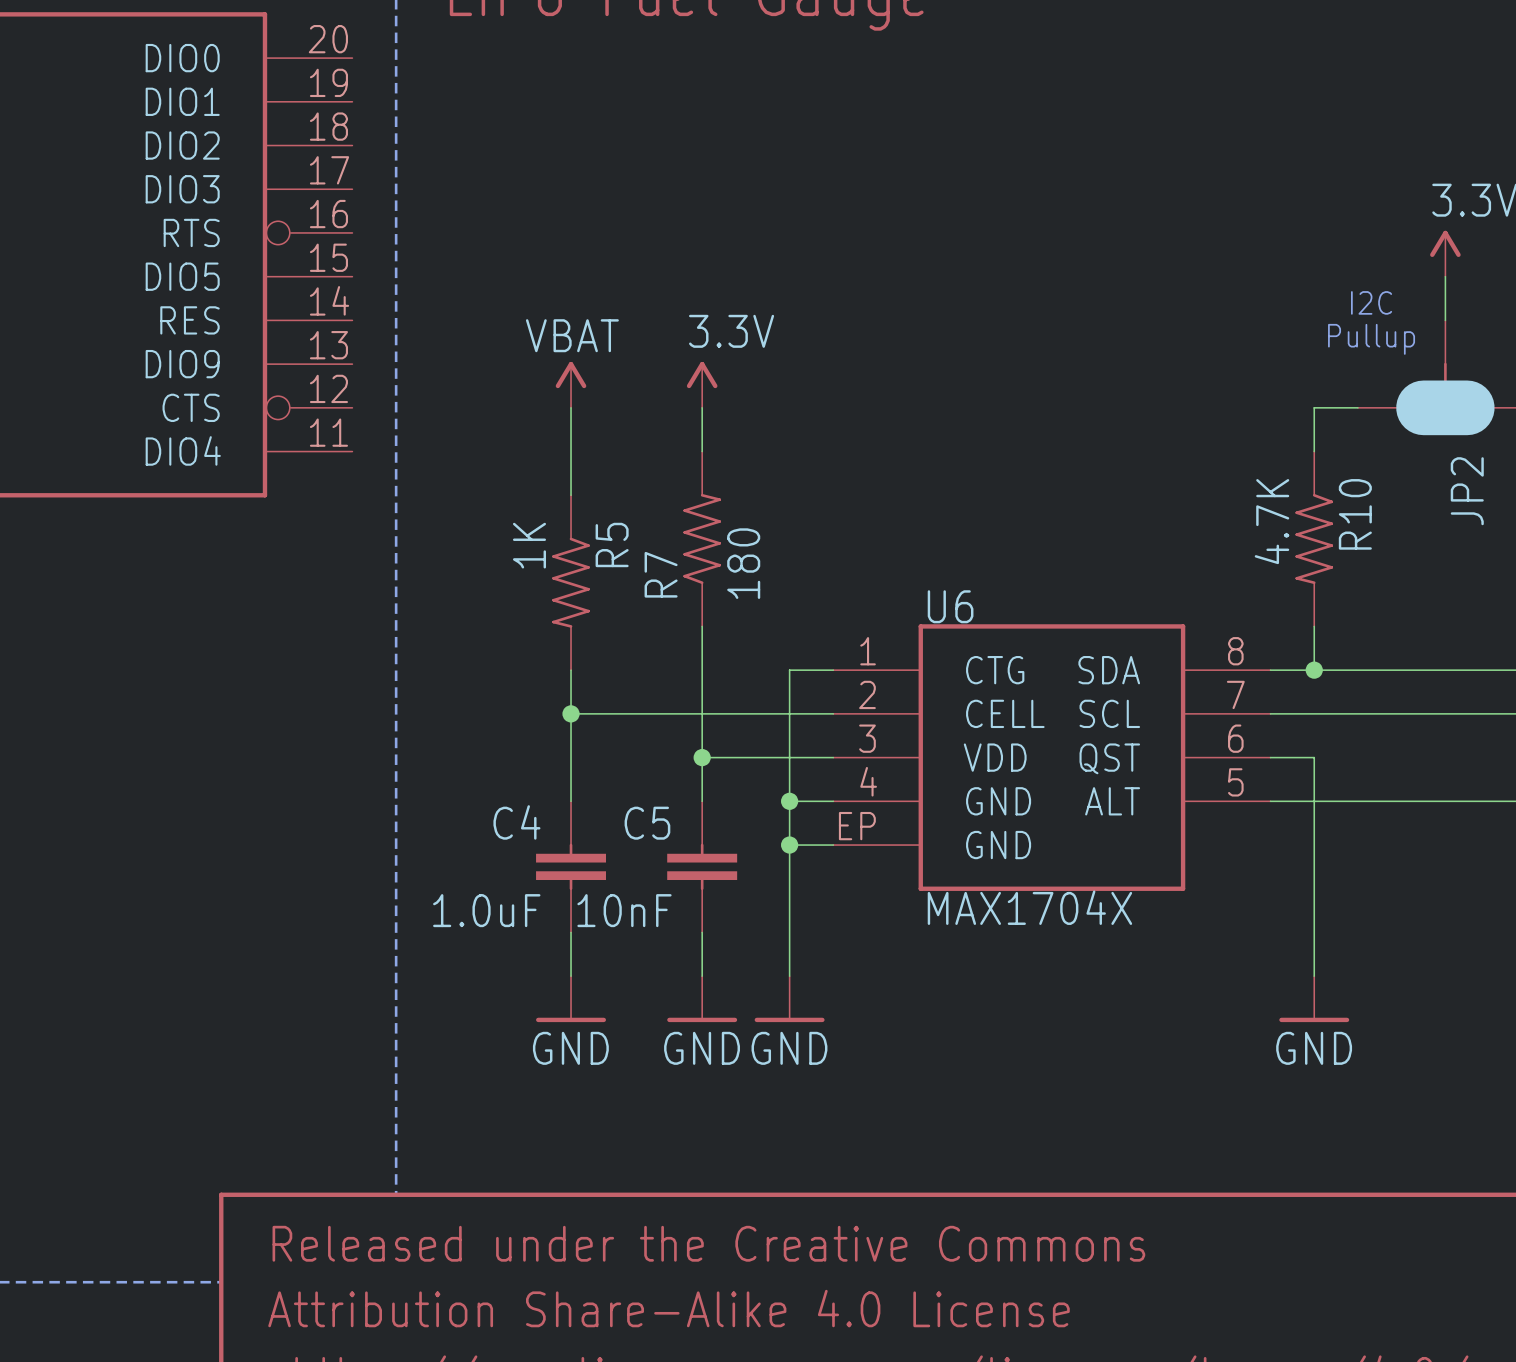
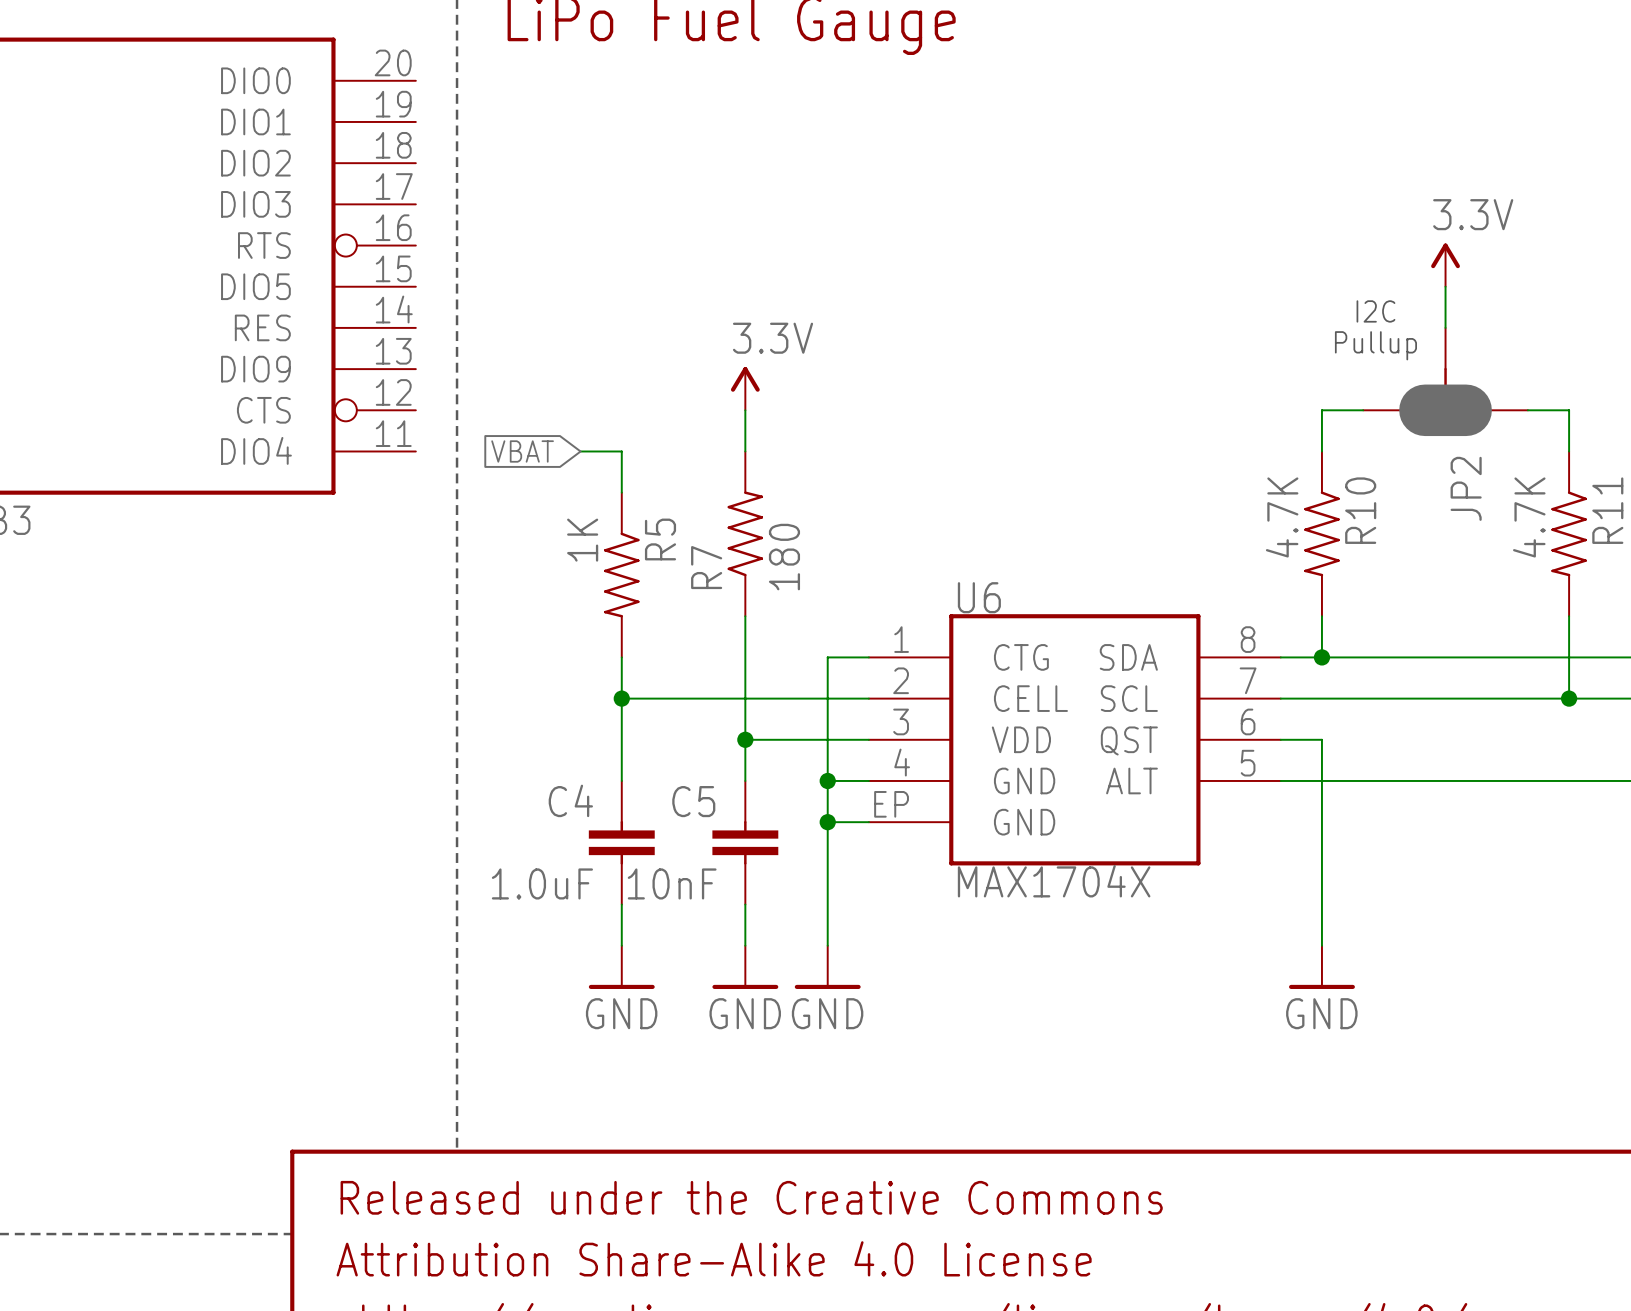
power symbol: VBAT (571, 384) -> none
wire: (571, 407) (571, 451) -> (580, 451) (621, 451)
global label: none -> VBAT (522, 451)

